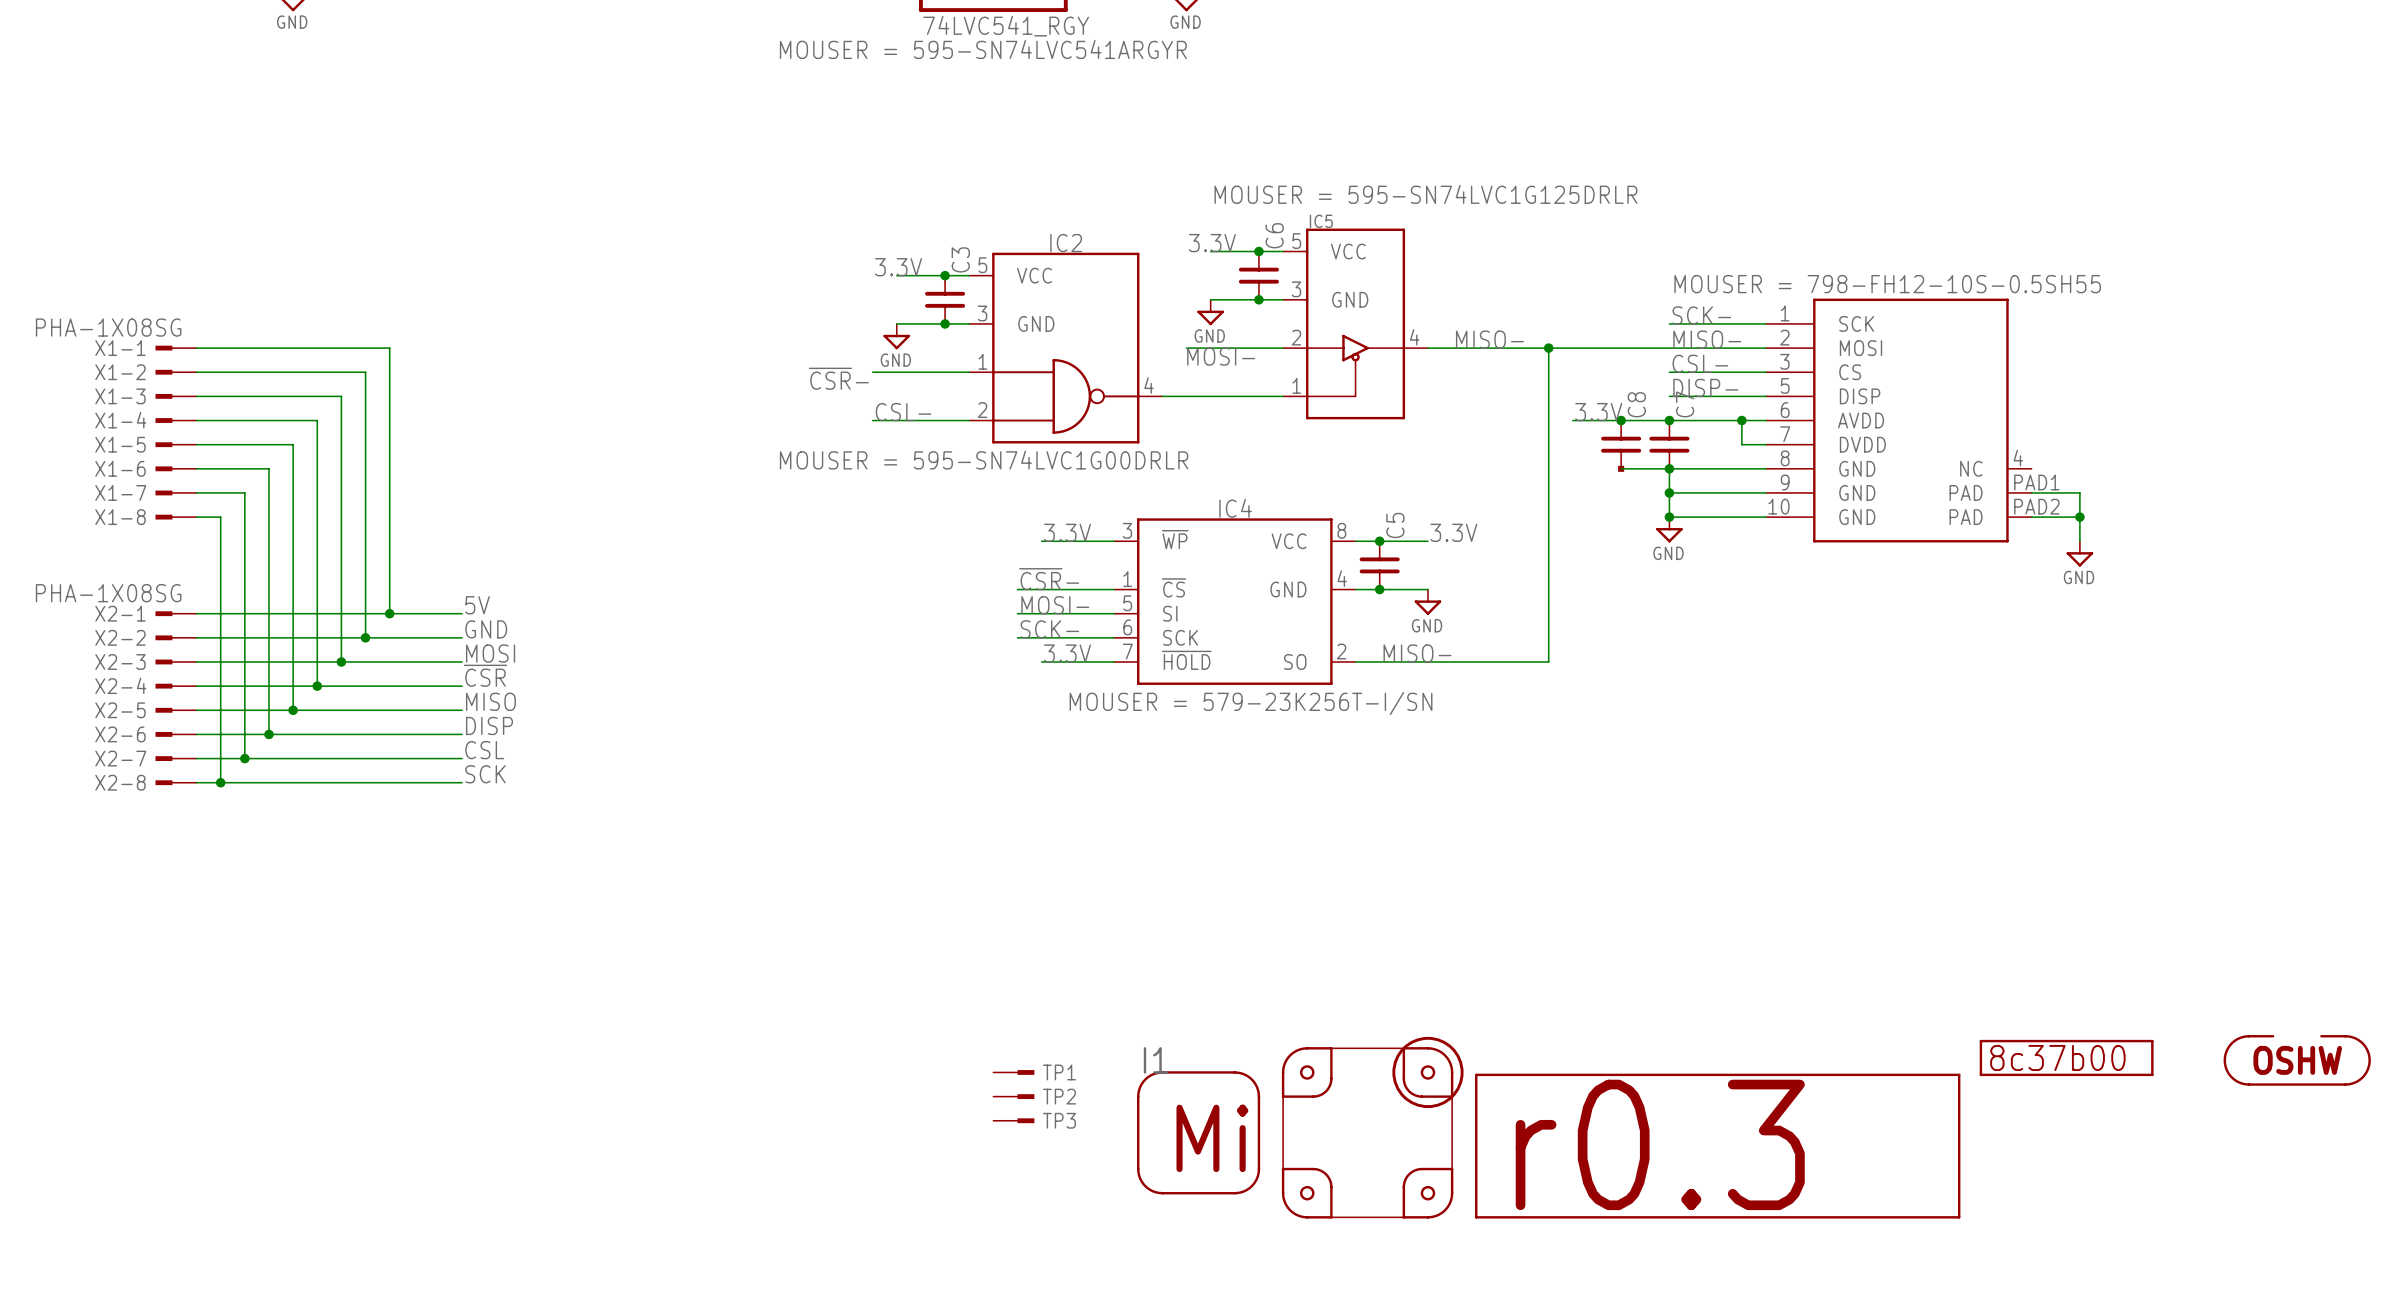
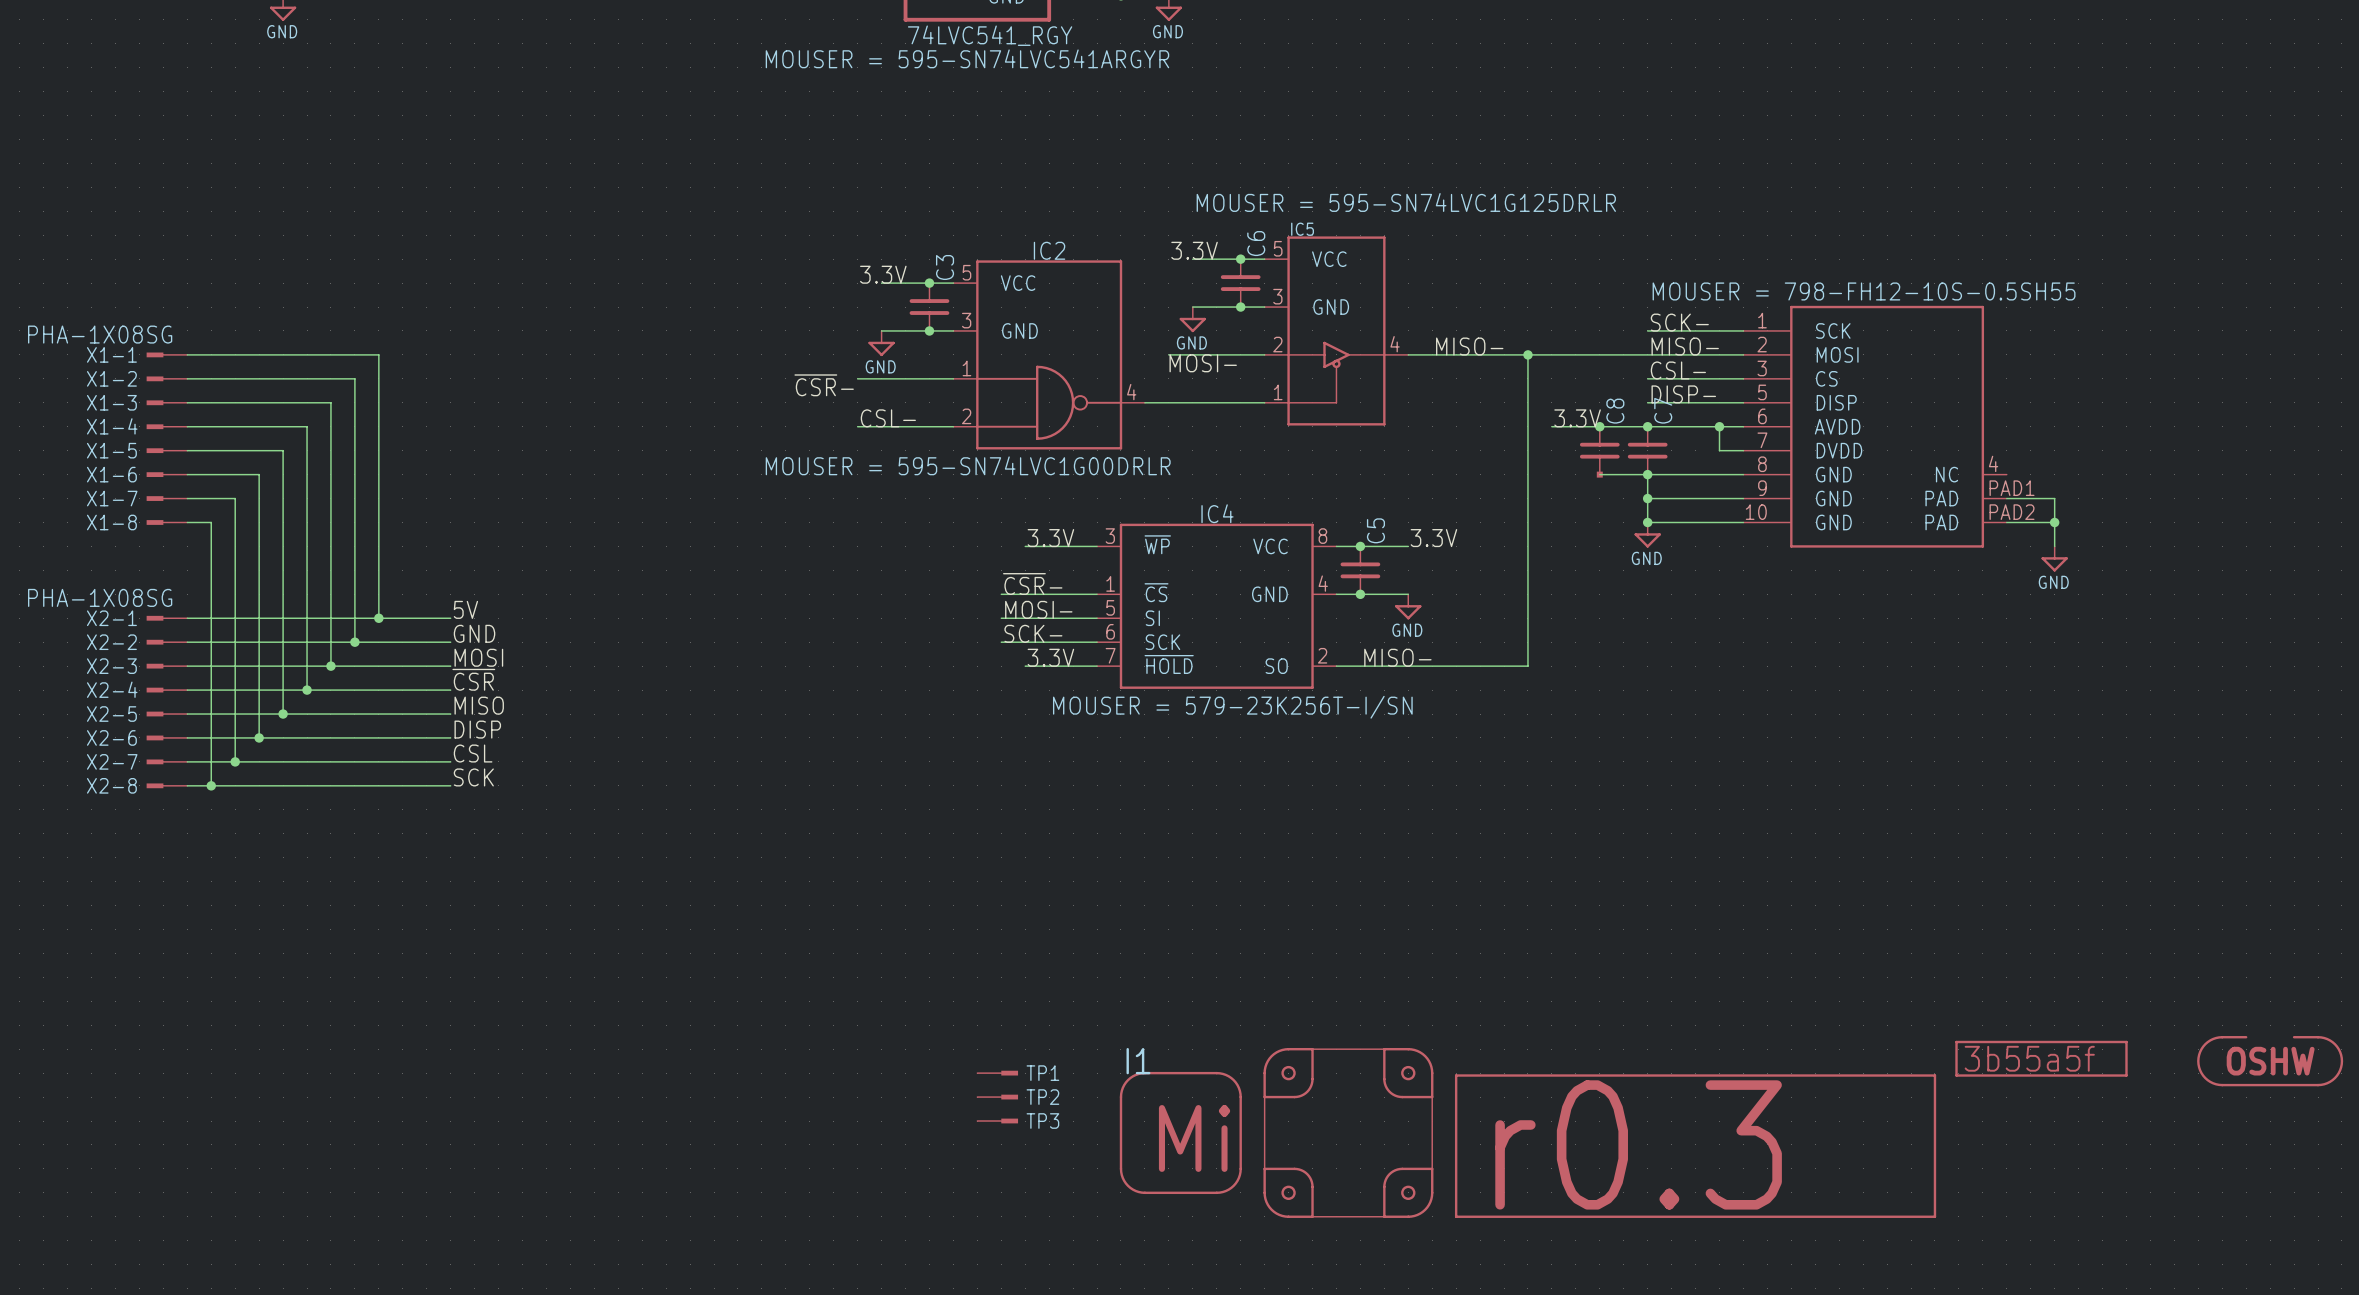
drawing: [1392, 1036, 1464, 1109] -> none
part value: 8c37b00 (2057, 1057) -> 3b55a5f (2029, 1058)

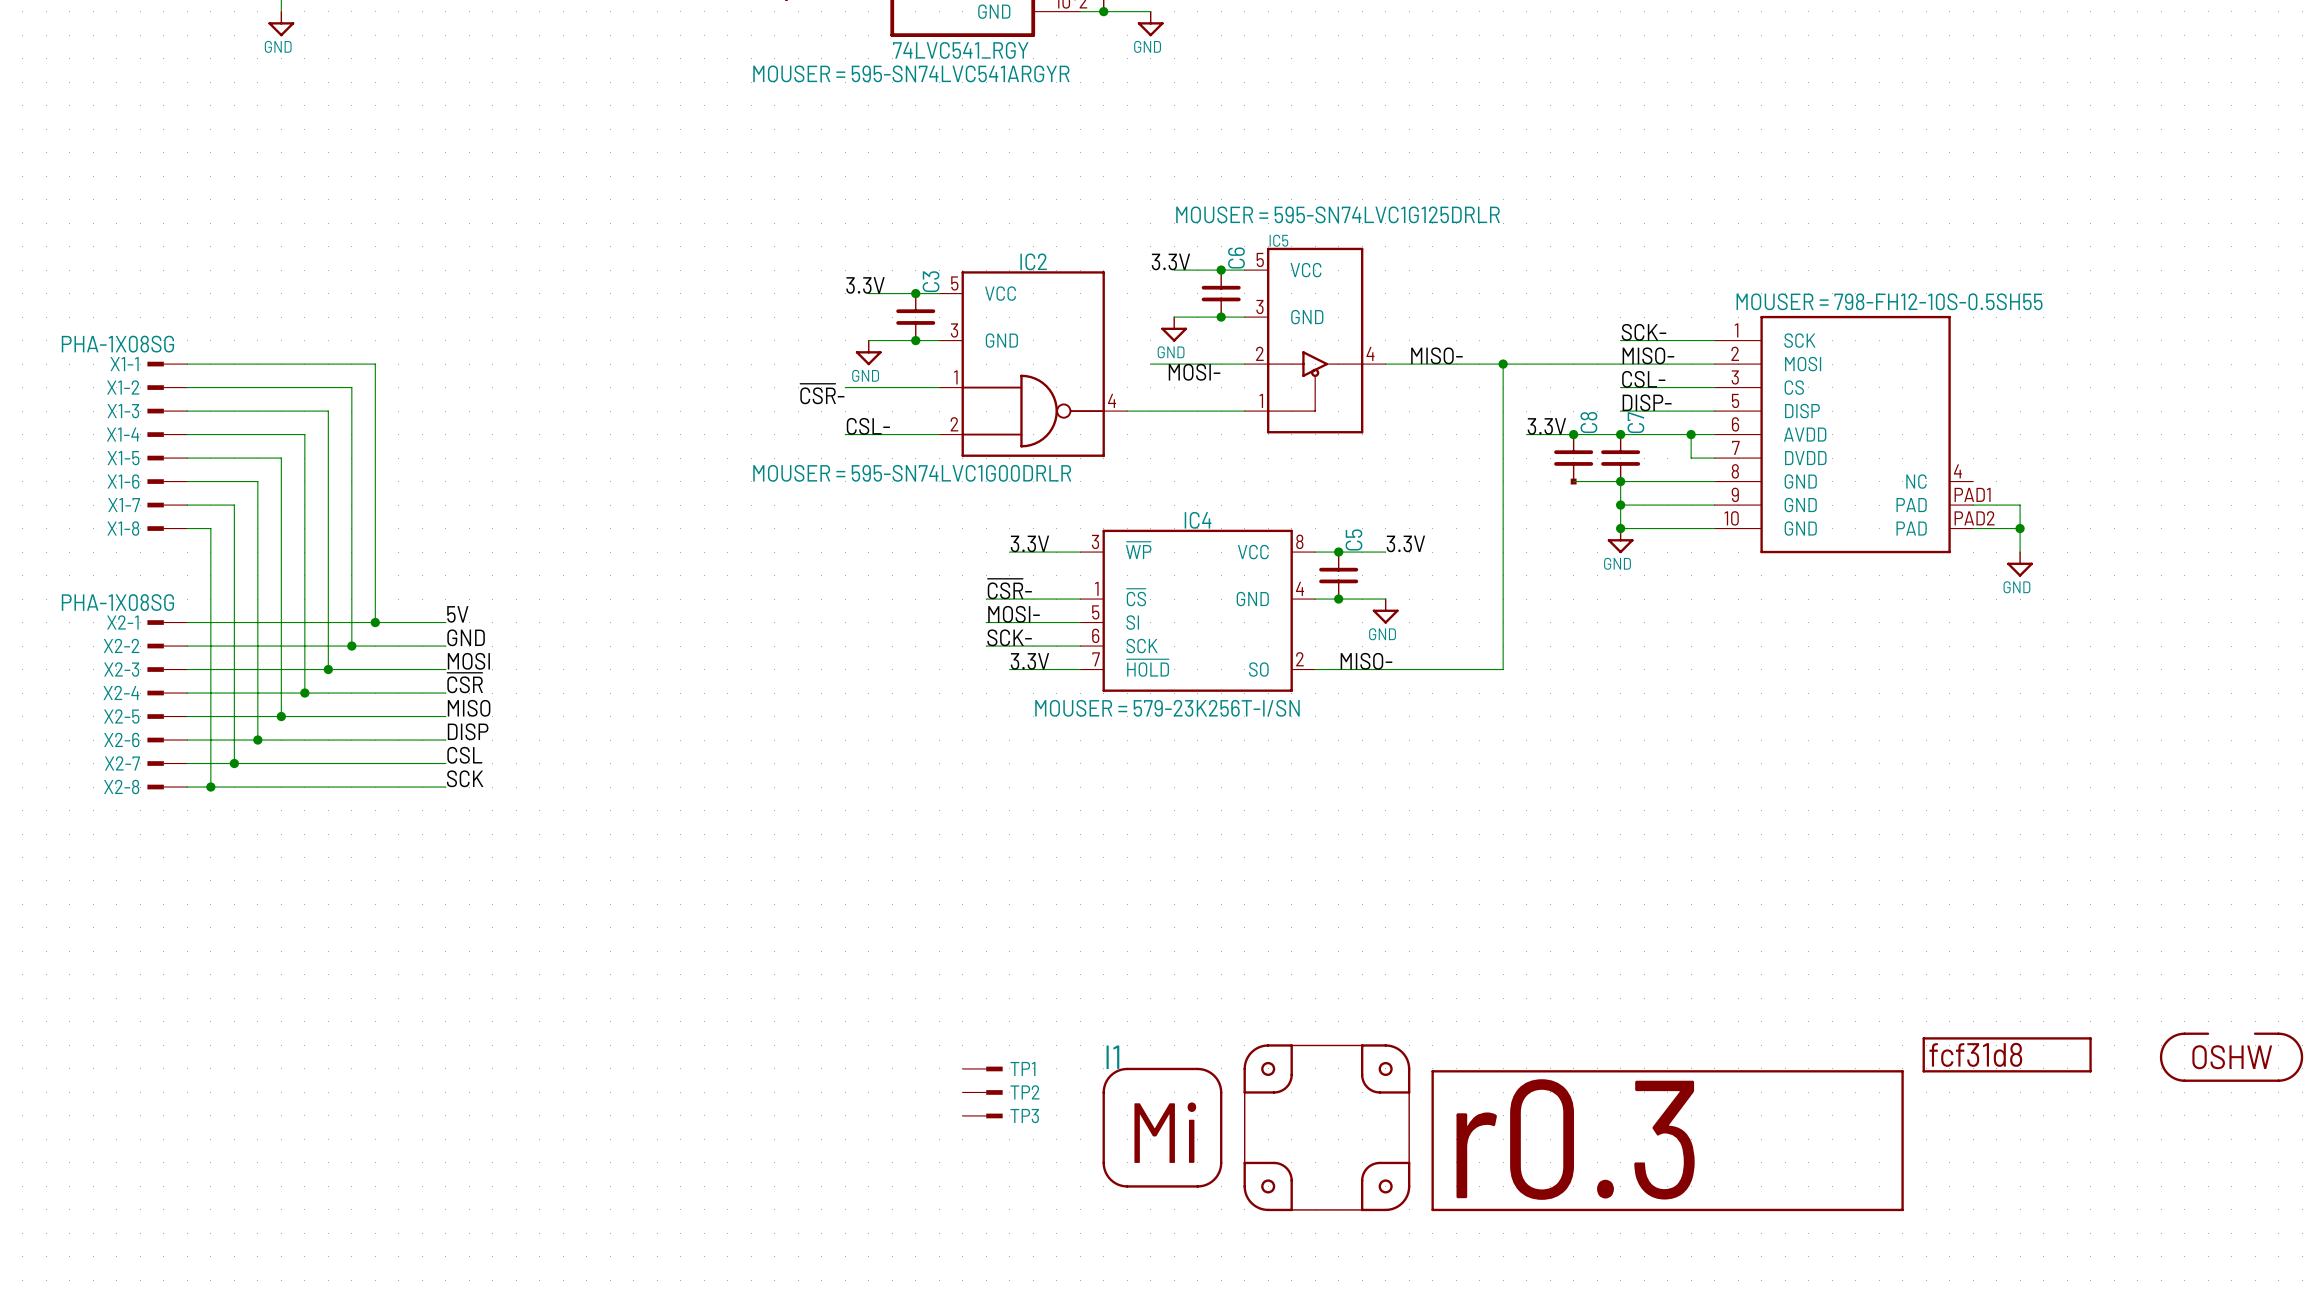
part value: 3b55a5f (2029, 1058) -> fcf31d8 (1975, 1054)

